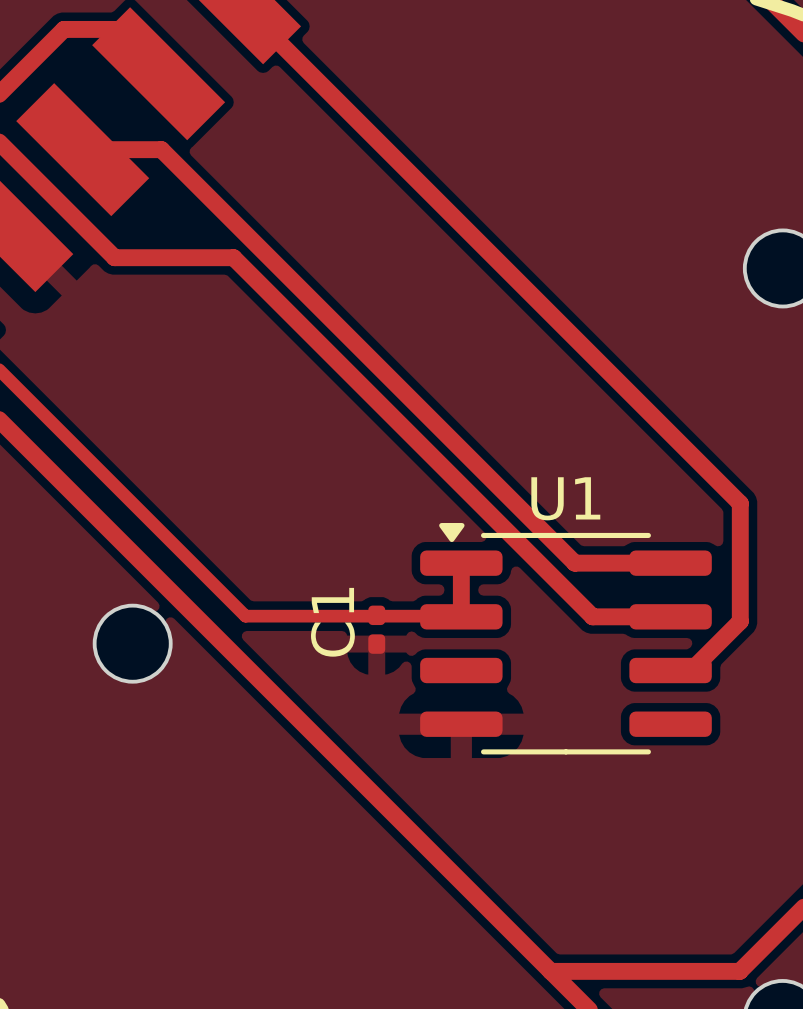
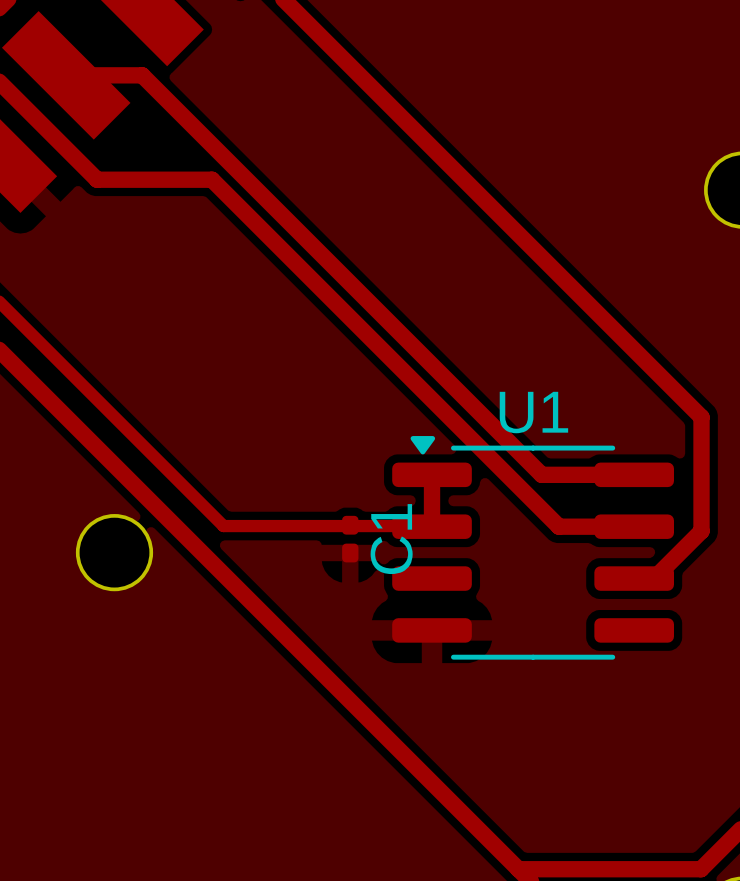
C1 name position: C1 (332, 622) -> C1 (391, 539)

